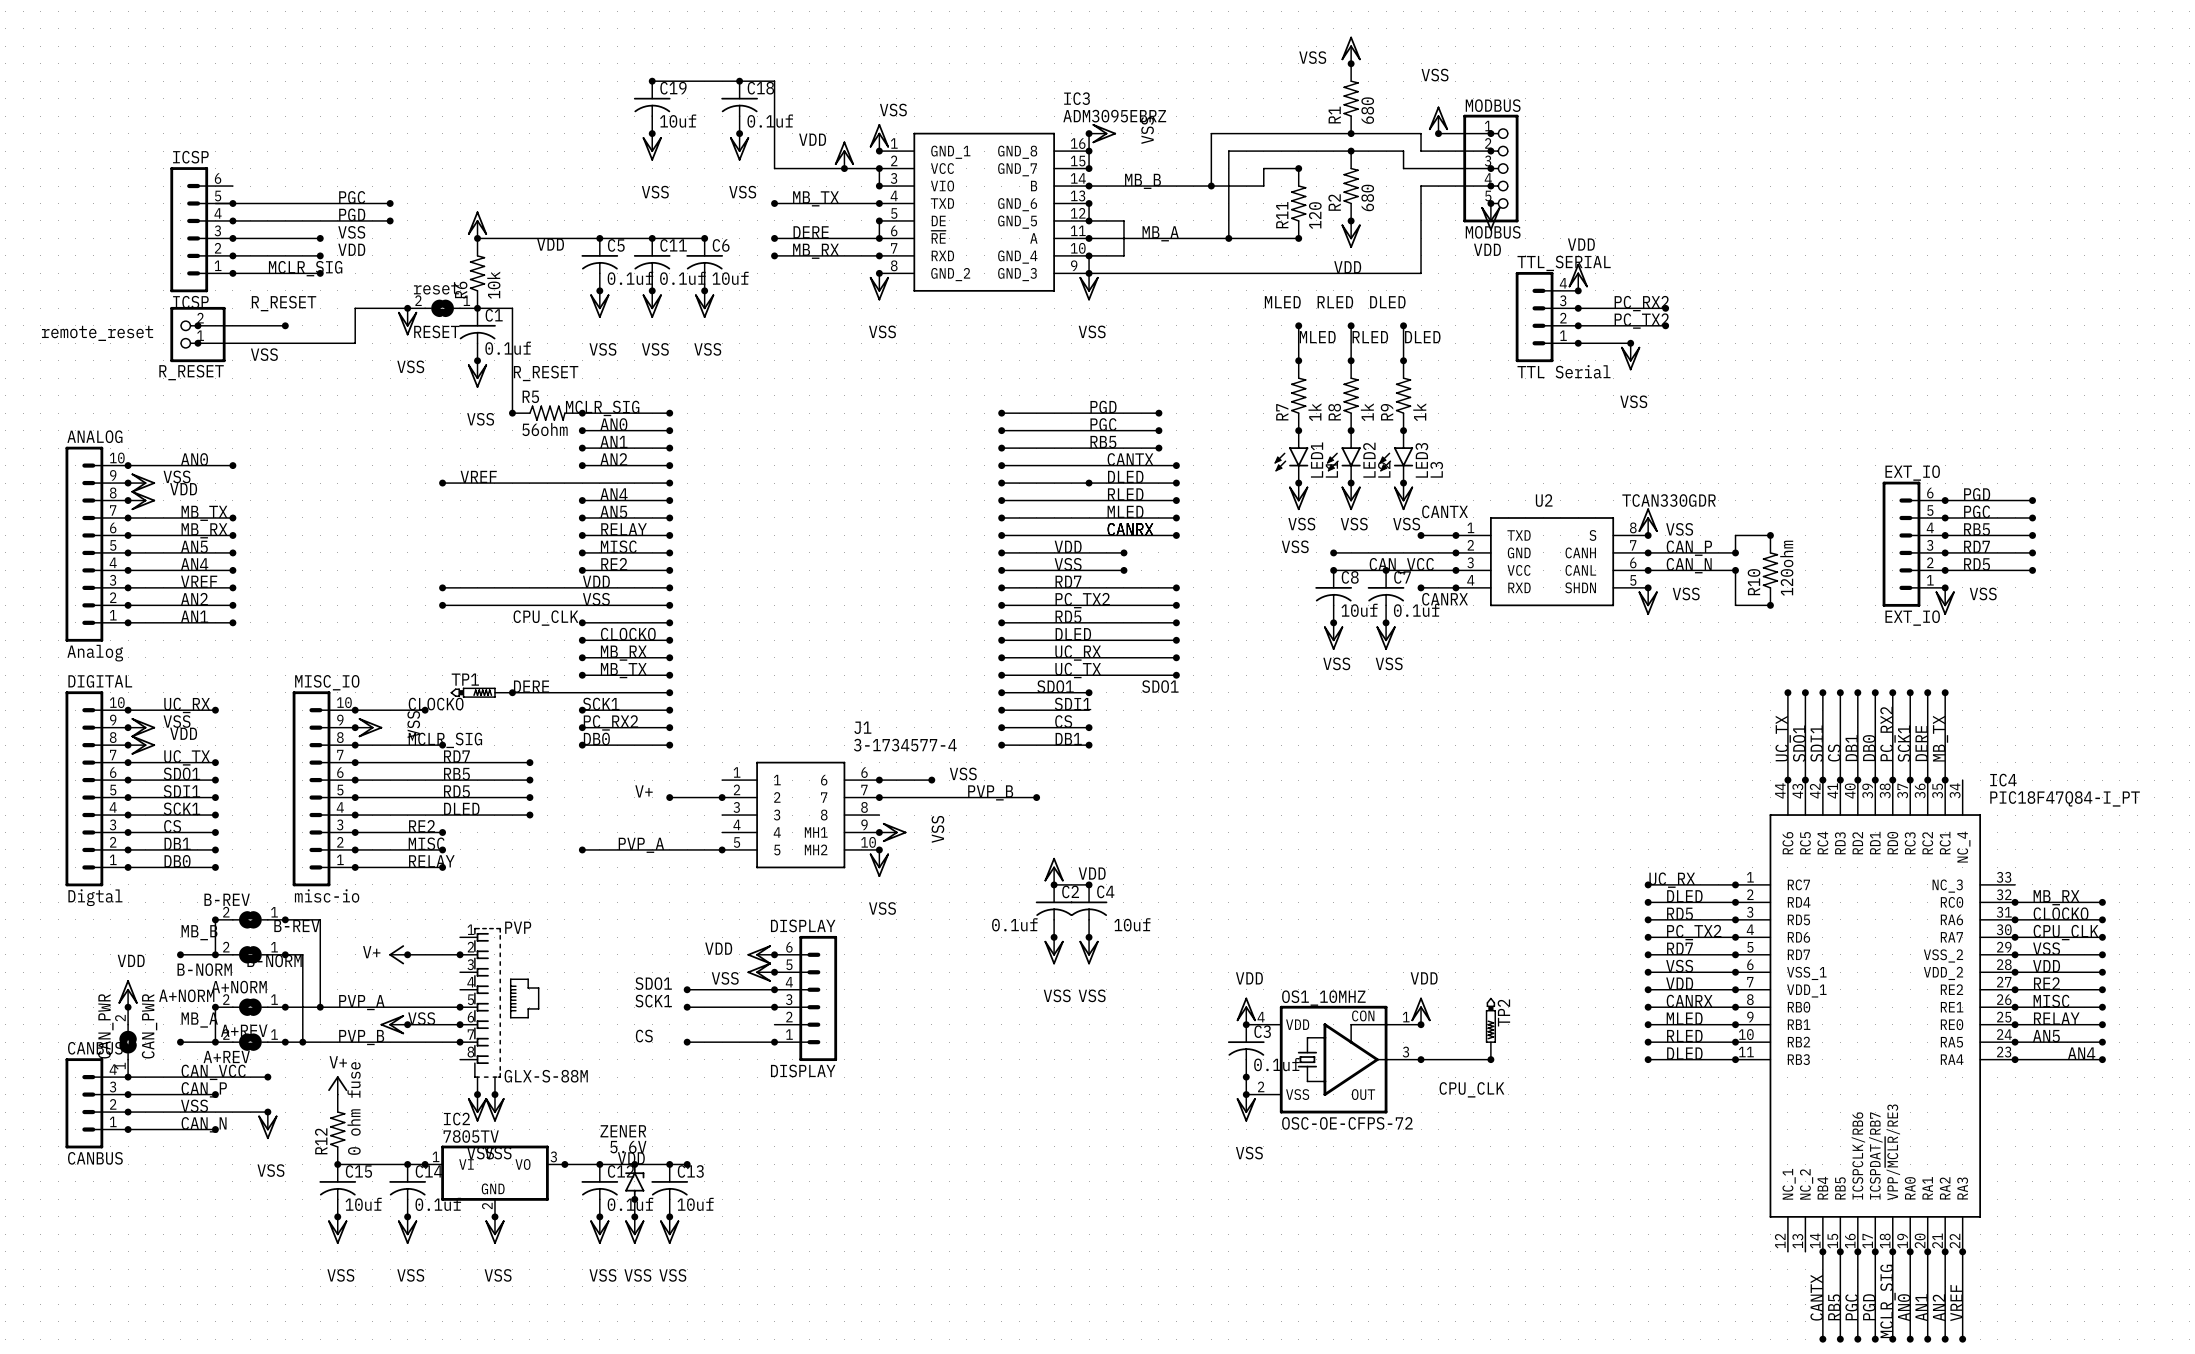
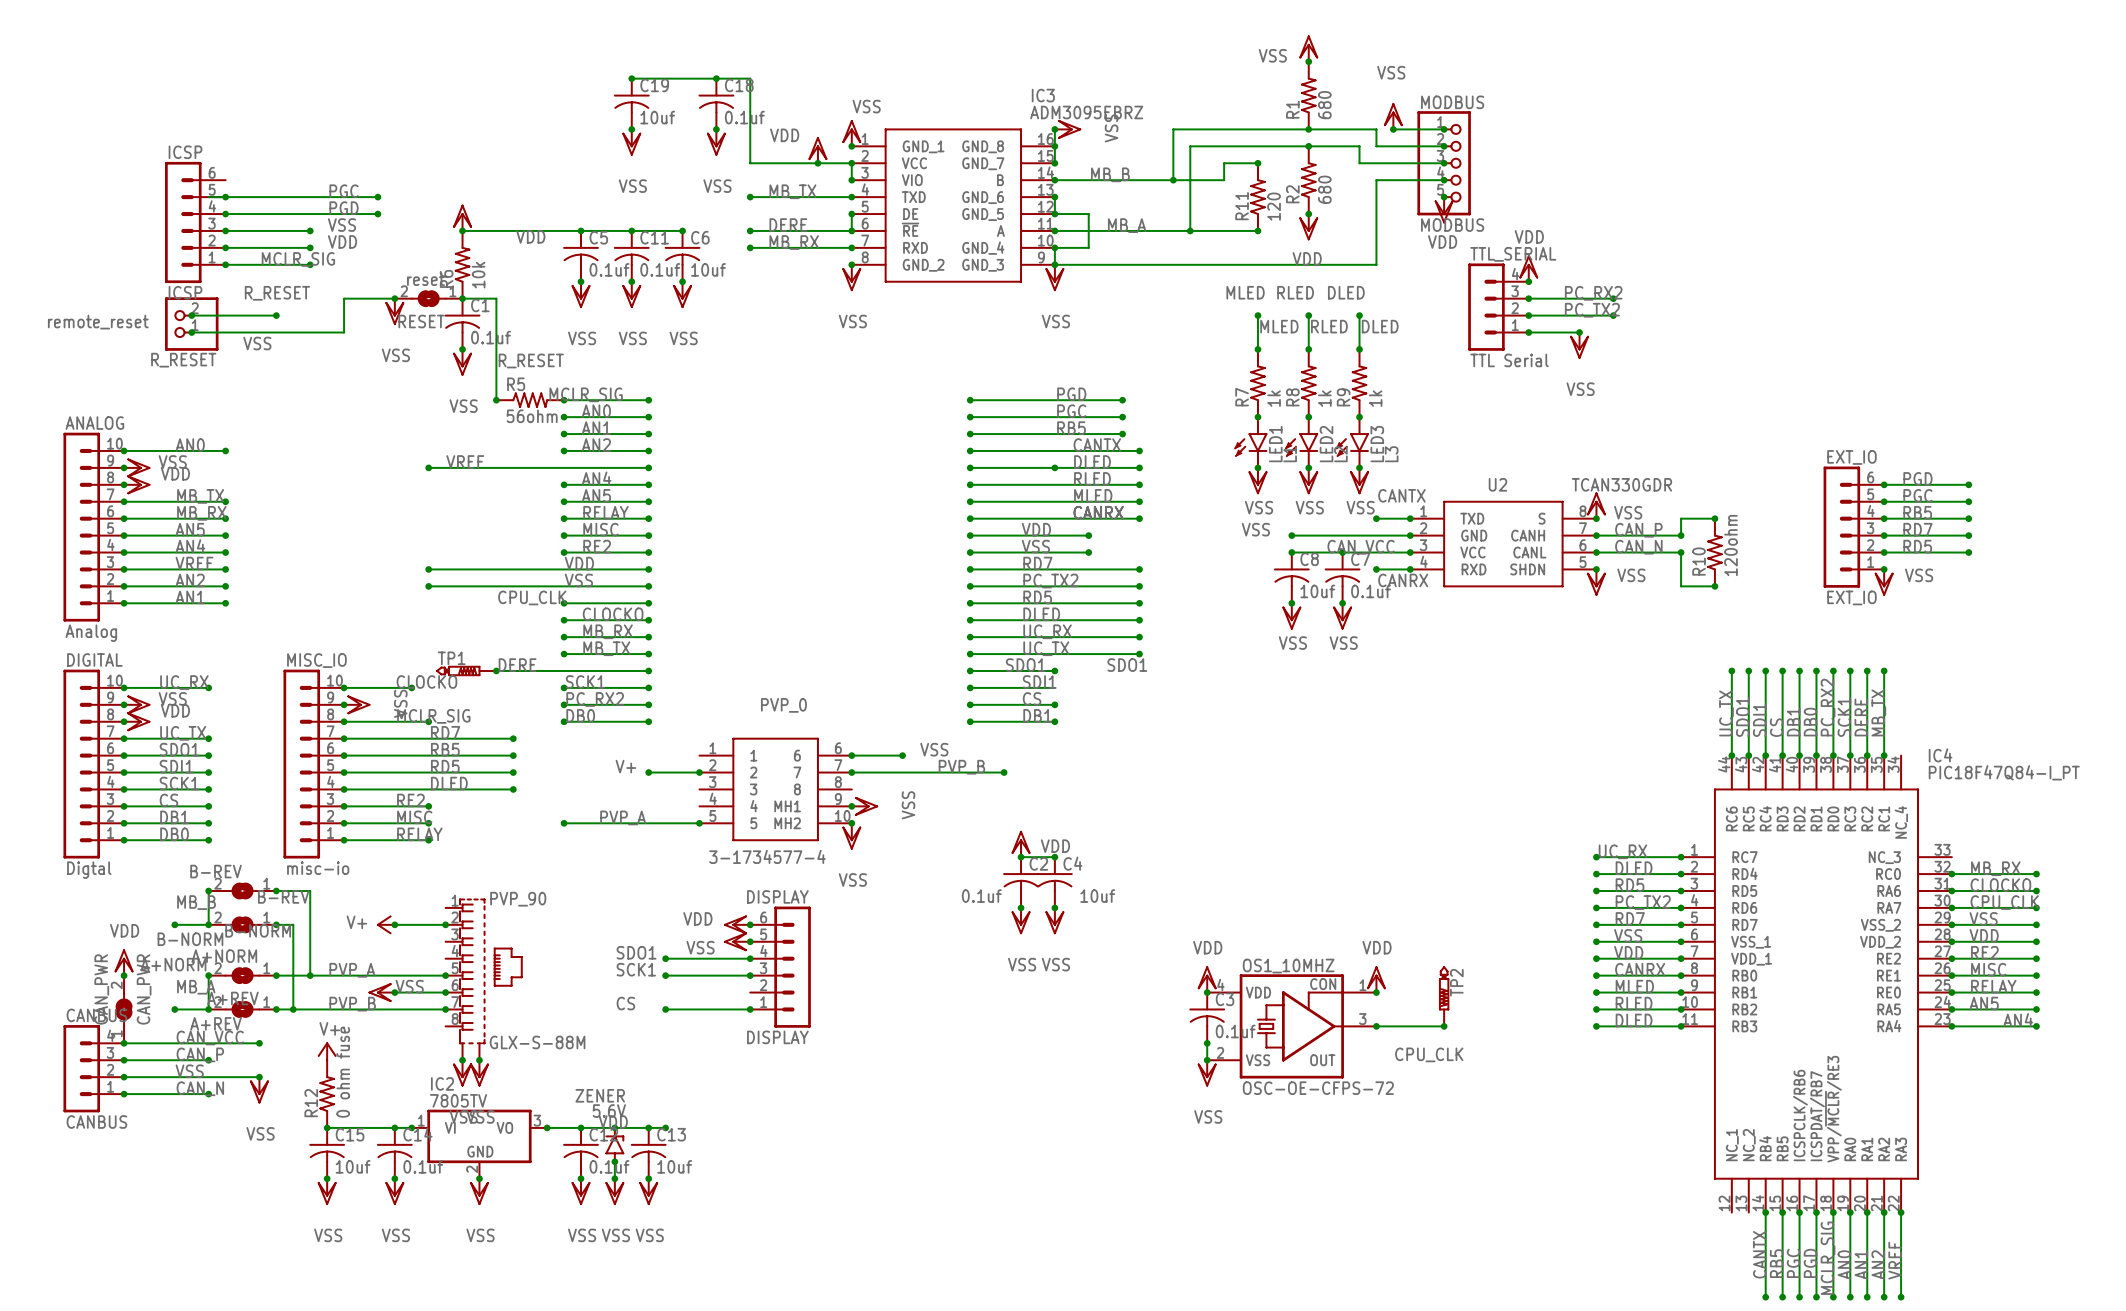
J1 name: J1 (862, 727) -> PVP_0 (783, 705)
J1 value position: 3-1734577-4 (905, 745) -> 3-1734577-4 (767, 856)
PVP name: PVP (518, 927) -> PVP_90 (518, 899)

